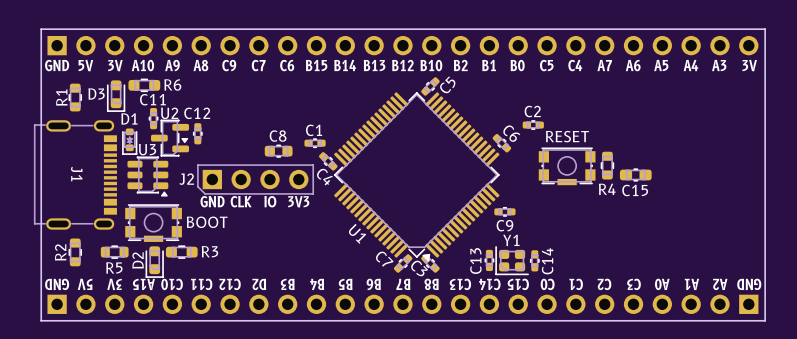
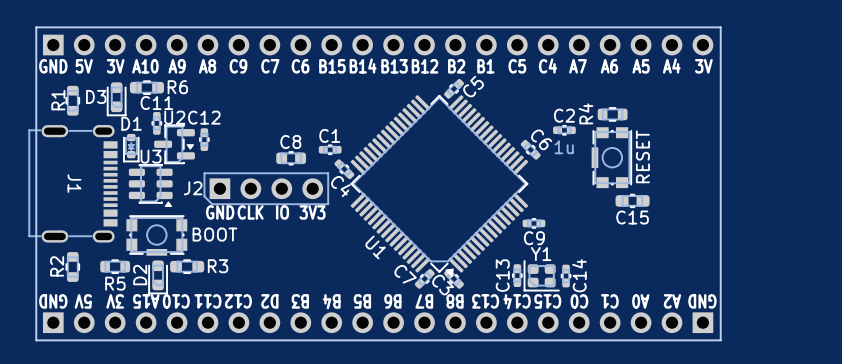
board edge: (678, 29) (765, 29) (765, 320) (678, 320) -> (720, 27) (720, 340)
part: (402, 45) -> none
text: B10 (431, 65) -> B2 (456, 66)
text: B2 (460, 65) -> B1 (485, 66)
text: B1 (489, 65) -> C5 (517, 66)
text: B0 (517, 65) -> C4 (548, 66)
text: C5 (546, 65) -> A7 (577, 66)
text: C4 (575, 65) -> A6 (609, 66)
text: A7 (604, 65) -> A5 (641, 66)
text: A6 (633, 65) -> A4 (671, 66)
text: A5 (661, 65) -> 3V (703, 66)
text: A4 (690, 65) -> none
text: A3 (719, 65) -> none
text: 3V (749, 65) -> none
C2 value: none -> 1u (564, 147)
R4 rotation: 0° (607, 165) -> 90° clockwise (612, 114)
R4 position: (607, 165) -> (612, 114)
part rotation: 0° (567, 166) -> 90° clockwise (611, 157)
C15 position: (635, 174) -> (632, 200)
text: C2 (604, 284) -> A0 (640, 301)
text: C3 (633, 284) -> A2 (672, 301)
text: A0 (662, 284) -> GND (702, 301)
text: A1 (691, 284) -> none
text: A2 (720, 284) -> none
text: GND (749, 284) -> none
part: none -> (378, 322)
part: (402, 304) -> none

